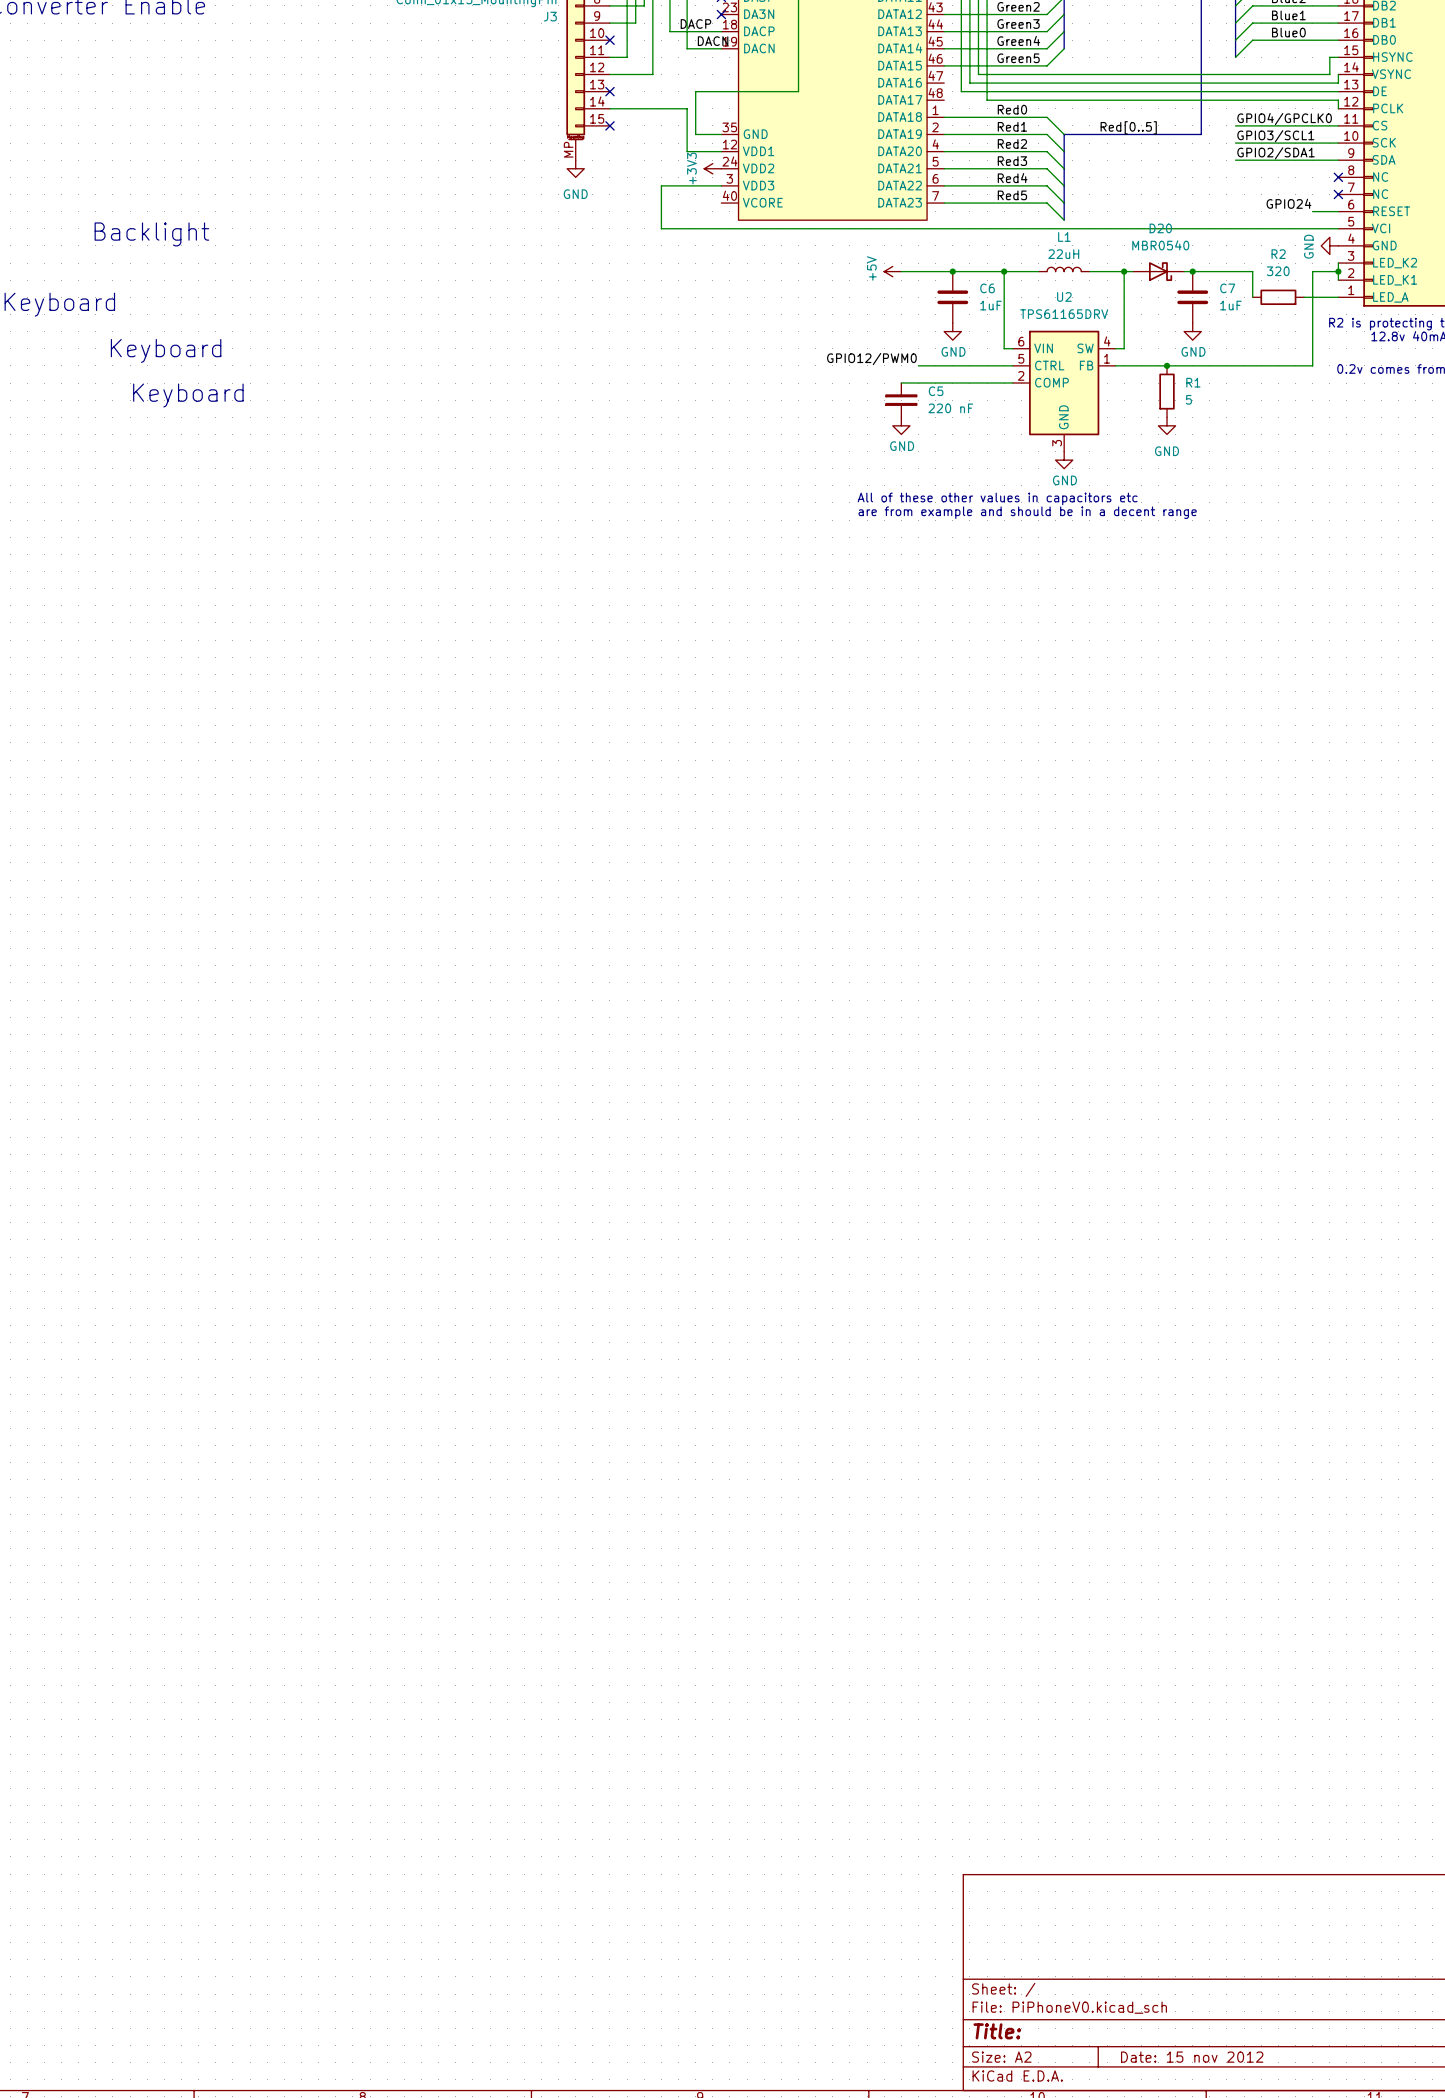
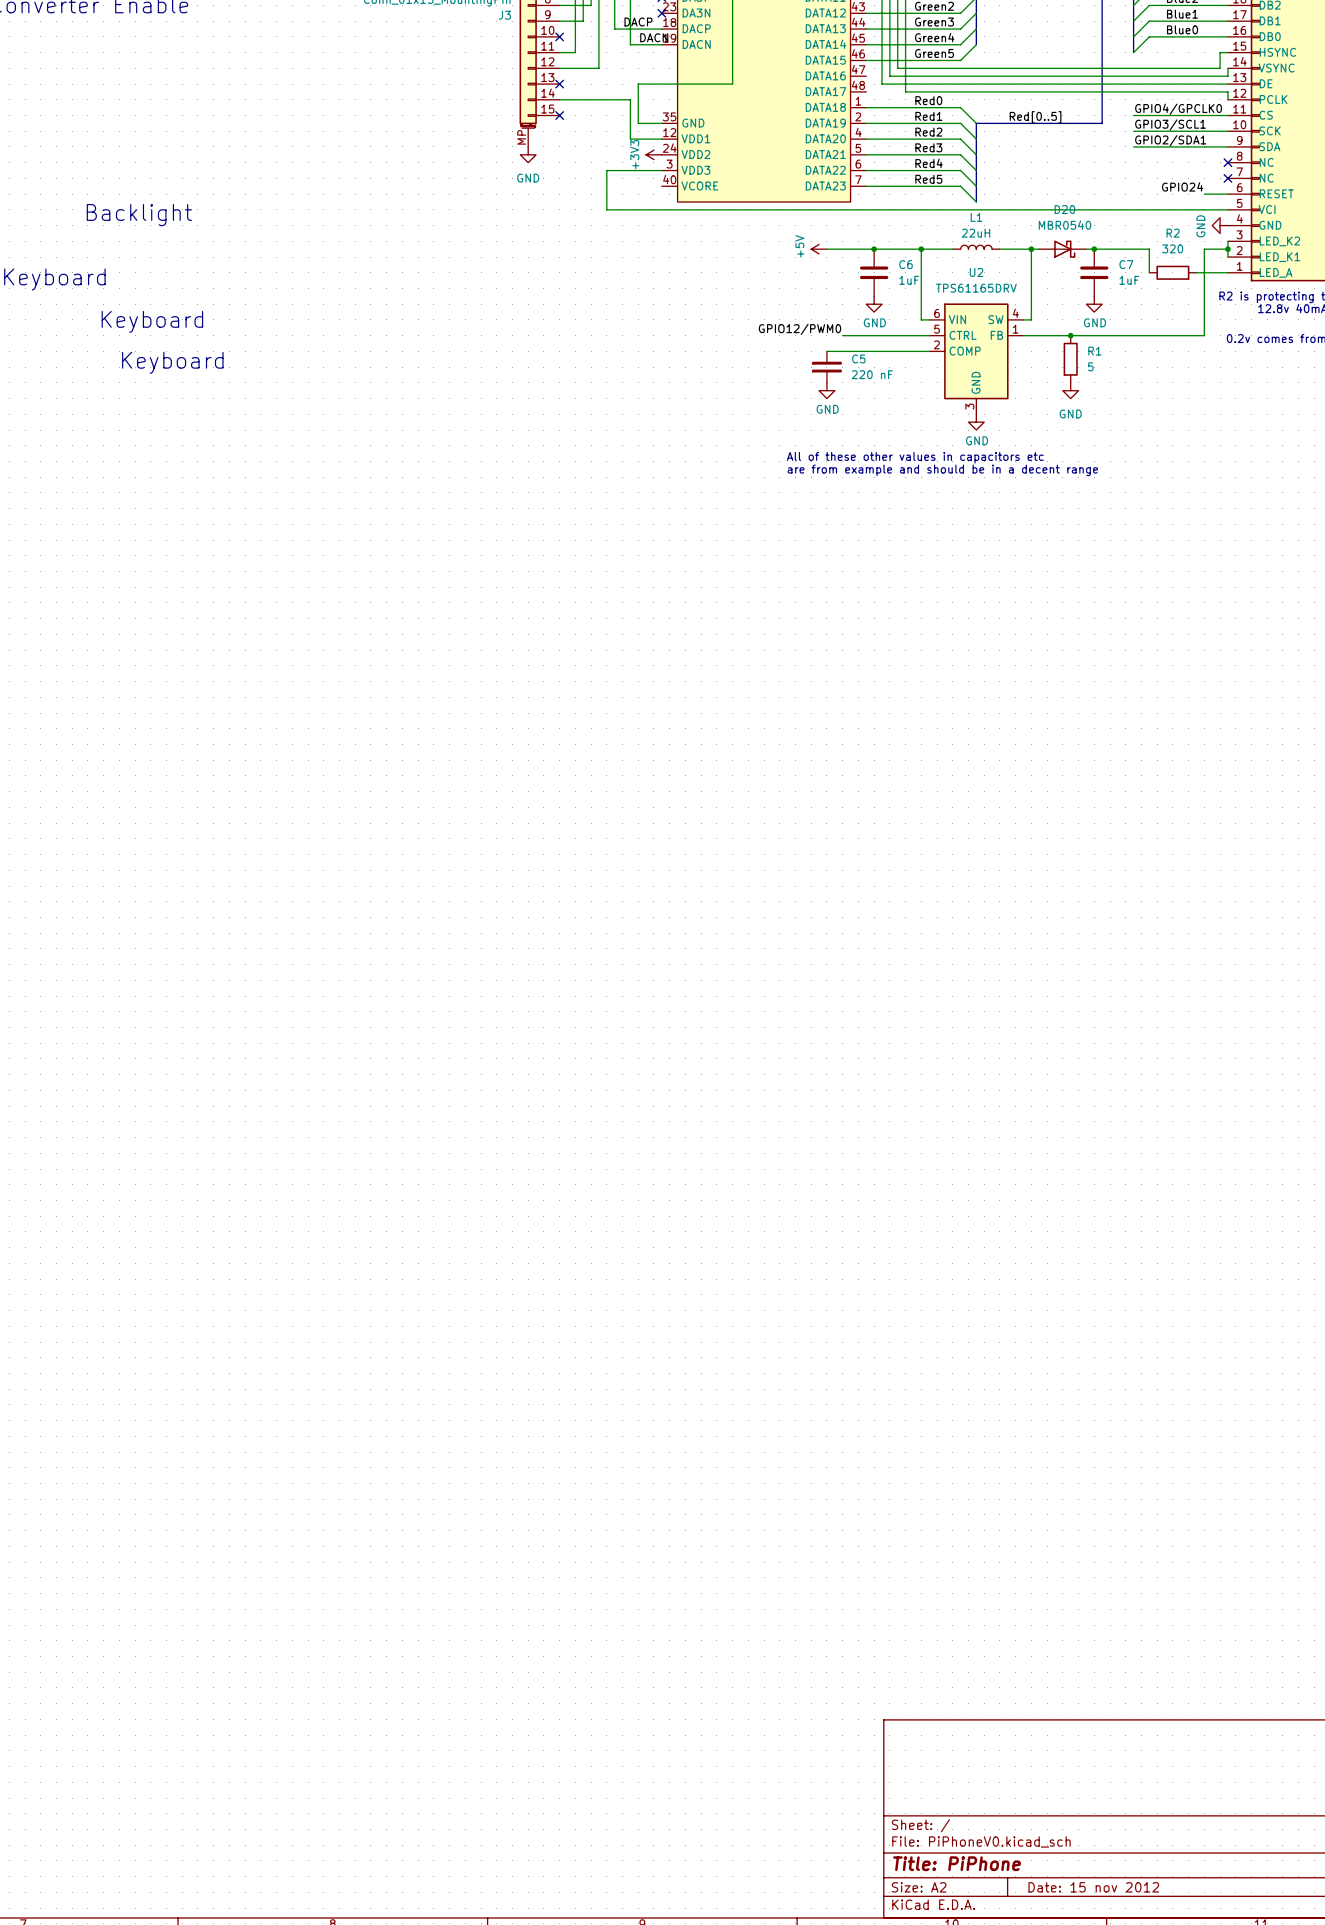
title block: Title: (997, 2031) -> Title: PiPhone (957, 1863)

